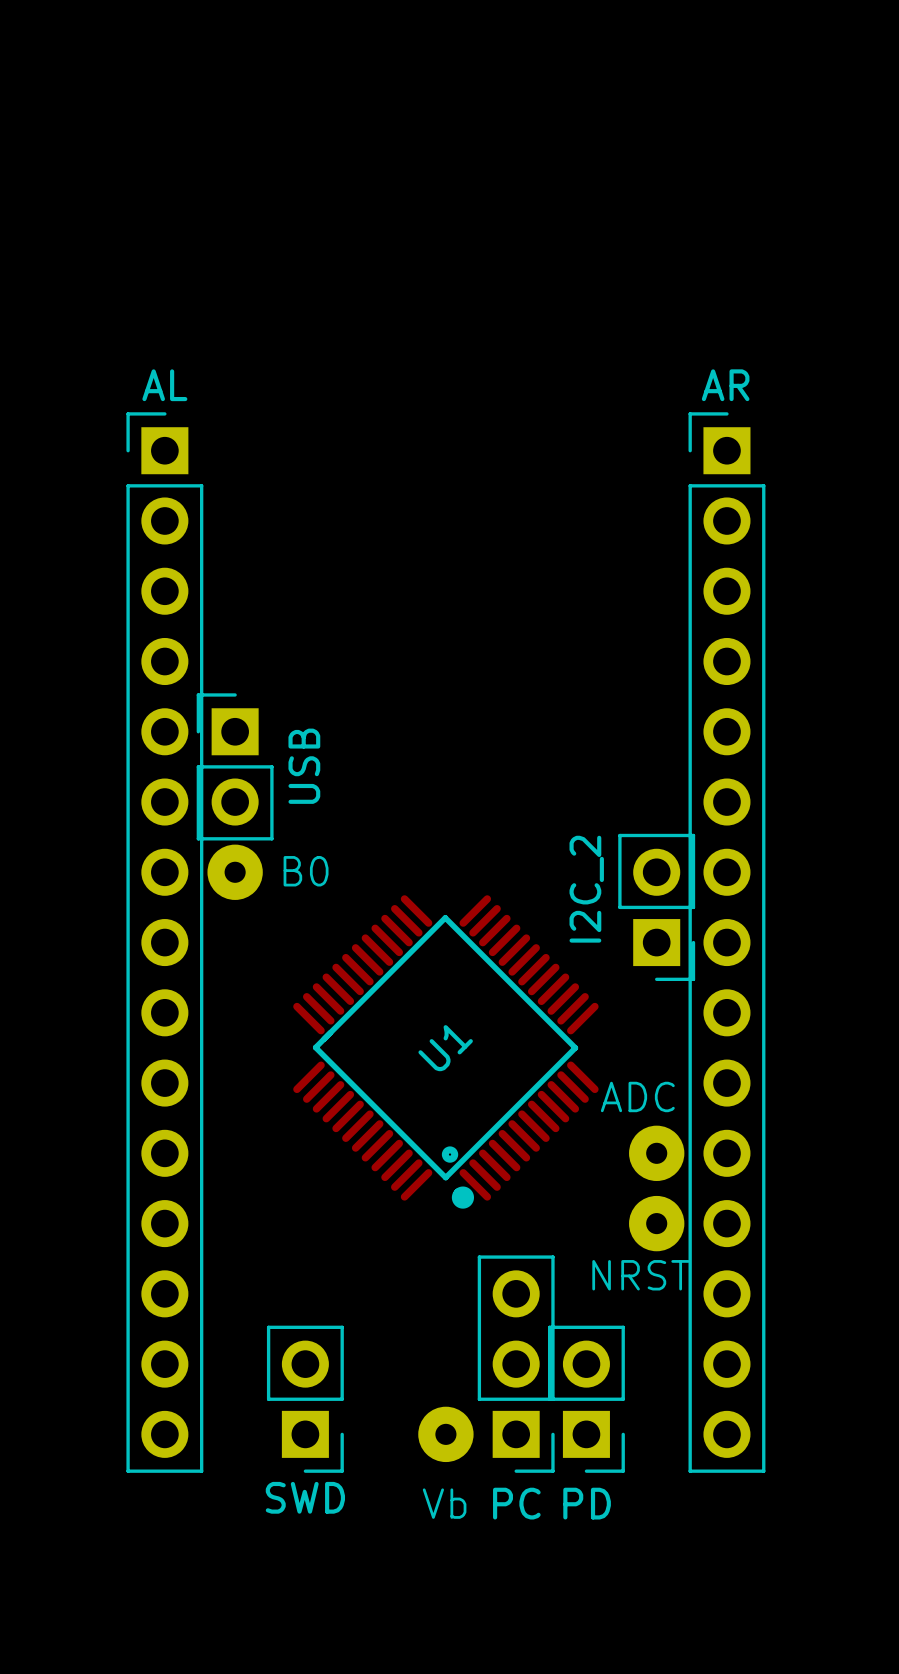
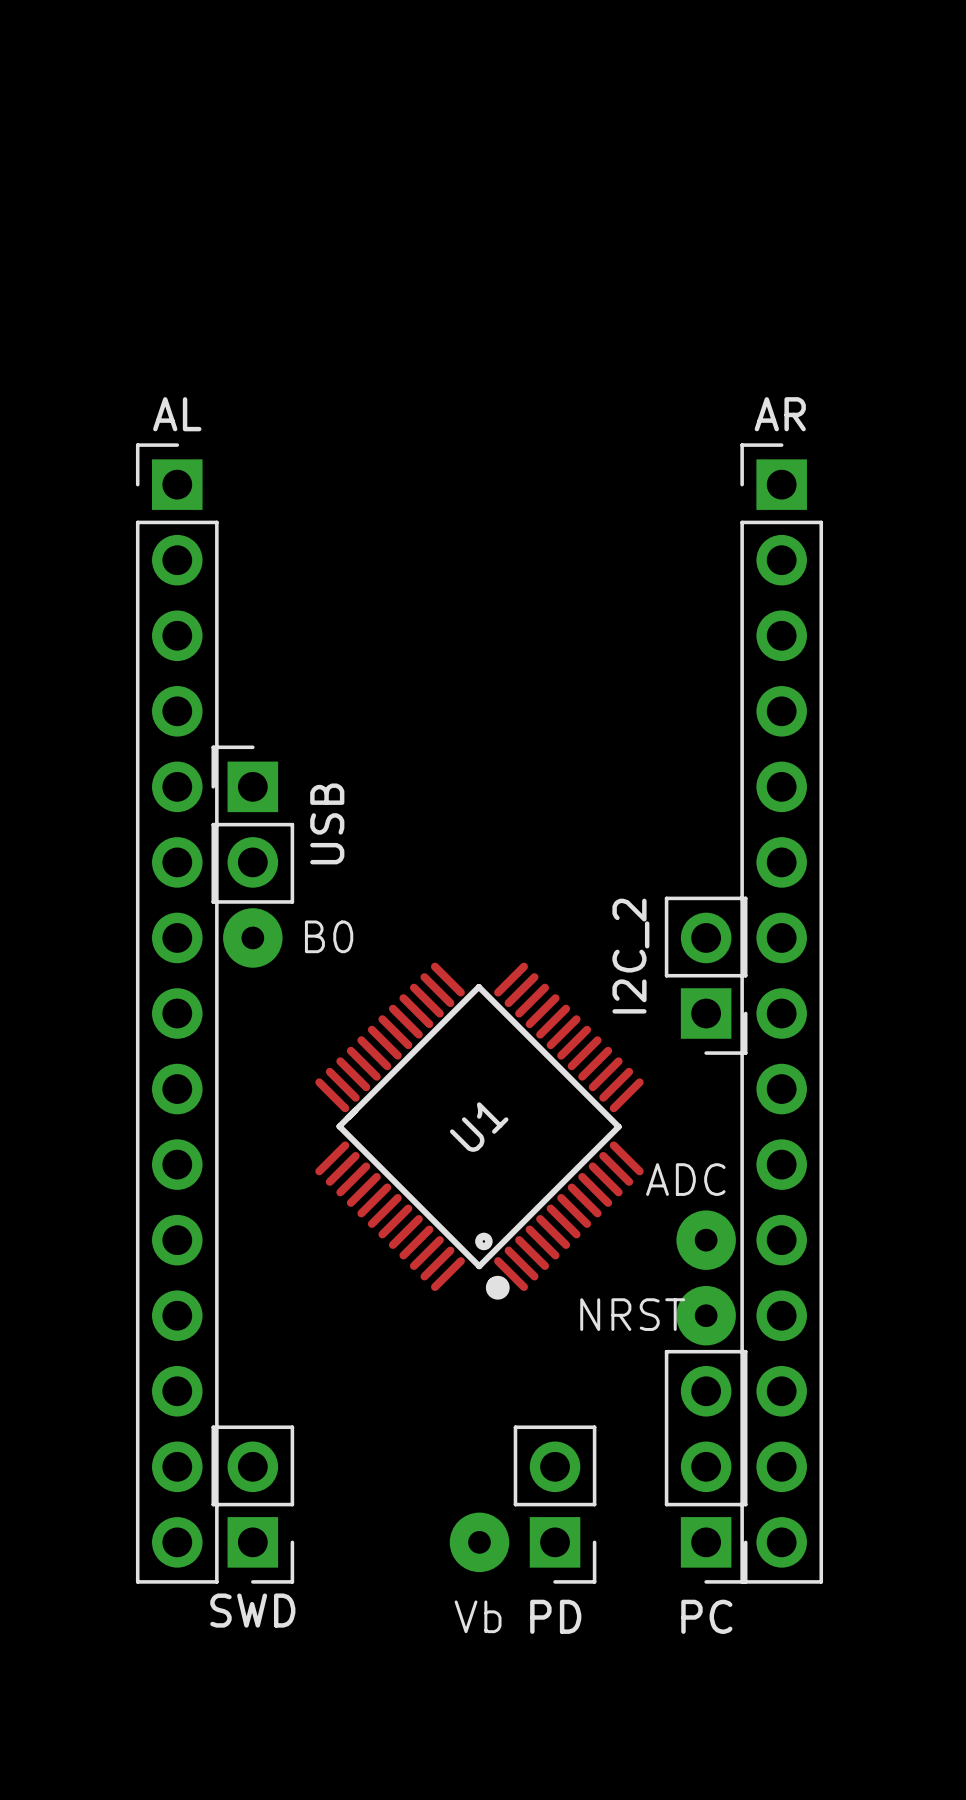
NRST name position: NRST (641, 1275) -> NRST (632, 1314)
PC position: (516, 1364) -> (706, 1466)
SWD position: (305, 1399) -> (252, 1504)
PD position: (586, 1399) -> (555, 1504)

